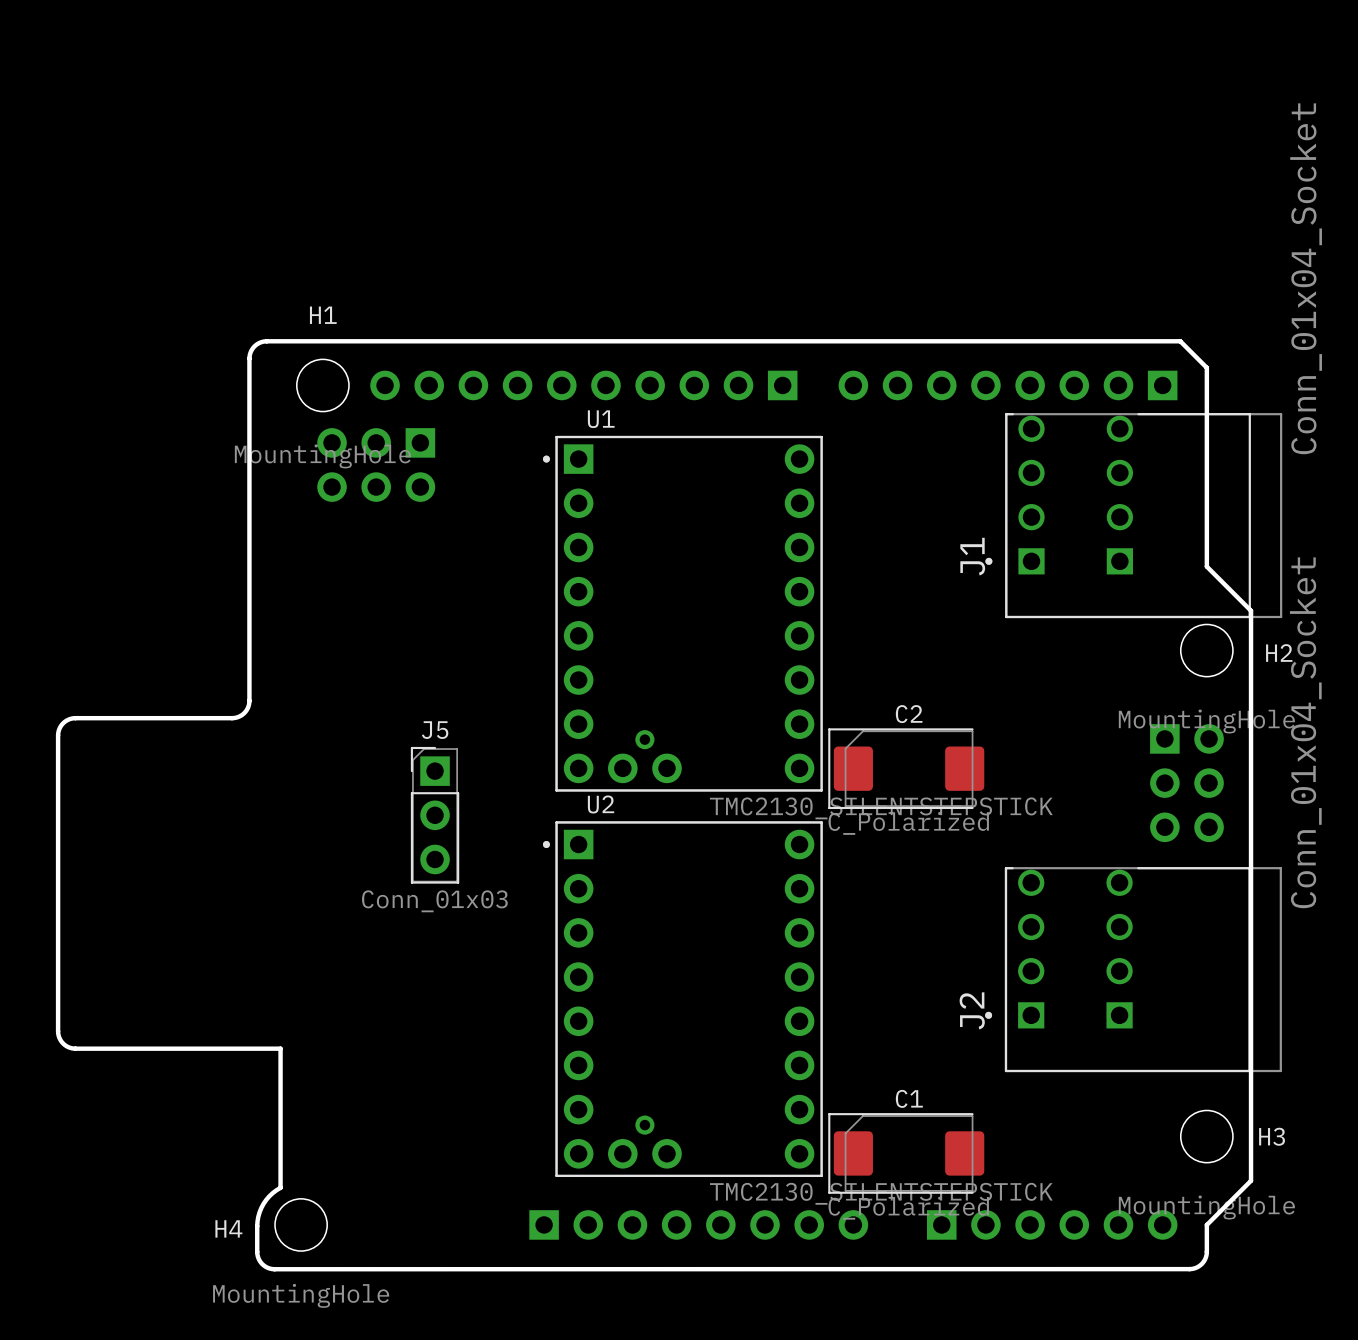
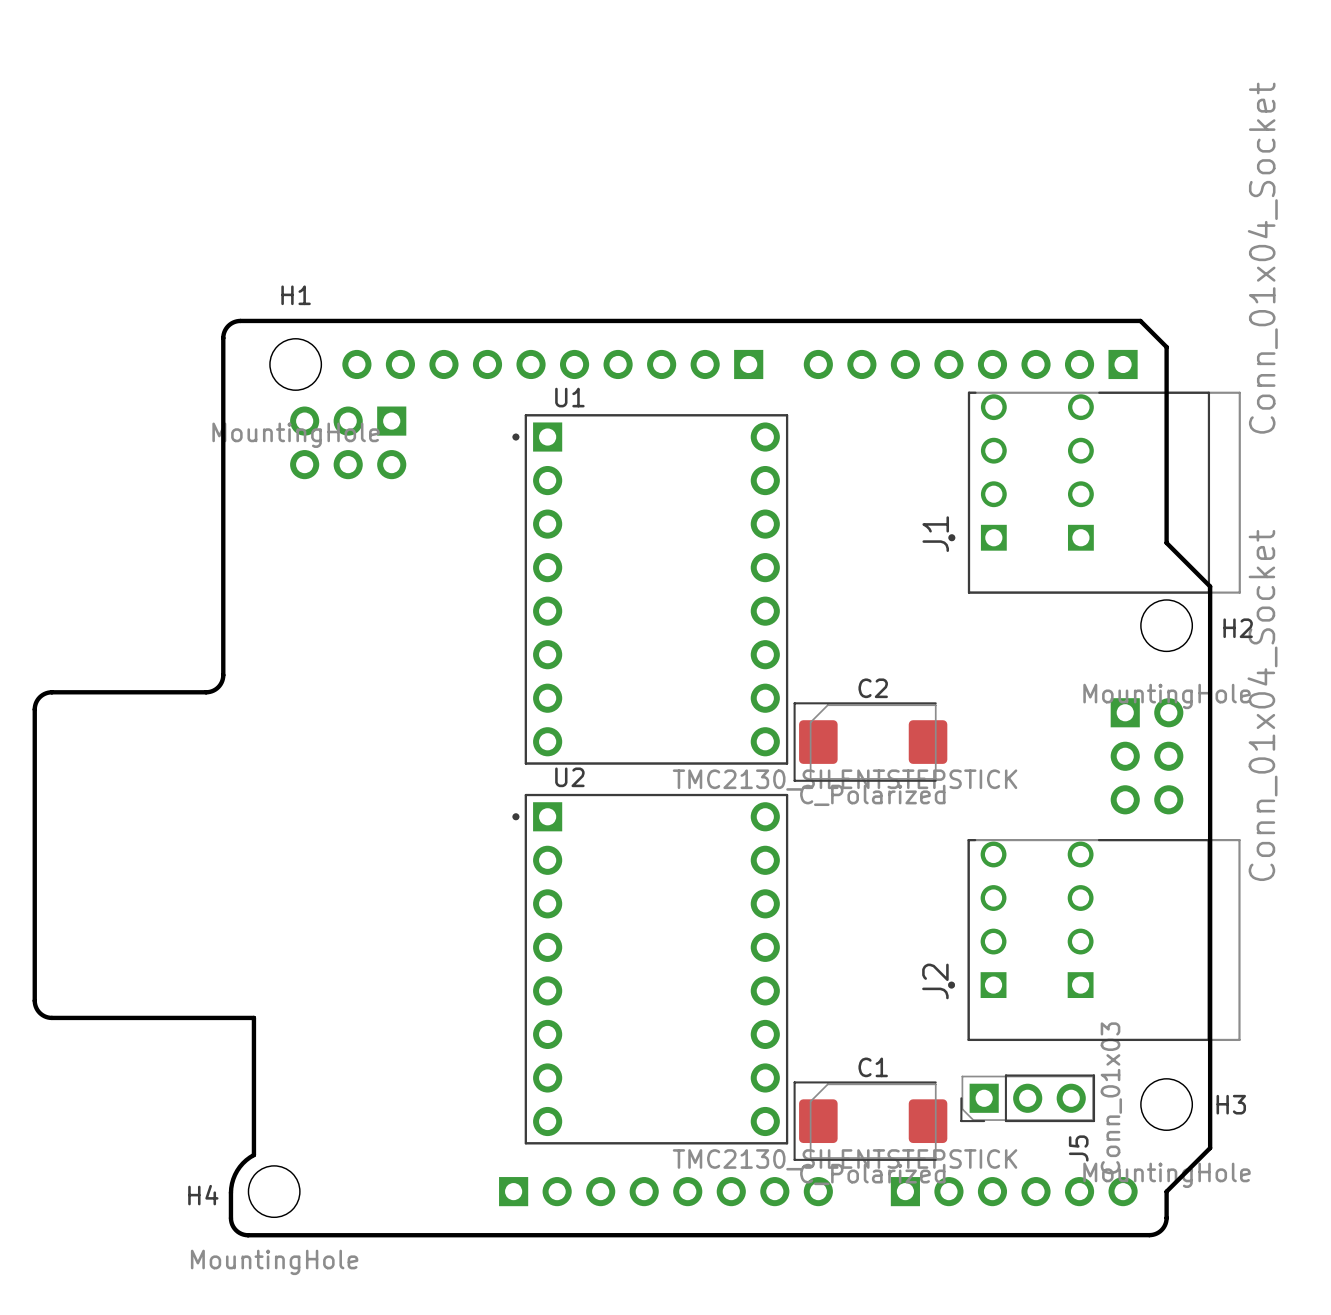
U1 footprint: [542, 435, 823, 792] -> [512, 414, 789, 765]
J5 name position: J5 (435, 730) -> J5 (1078, 1148)
J5 rotation: 0° (435, 815) -> 90° counterclockwise (1027, 1098)
J5 position: (435, 815) -> (1027, 1098)
U2 footprint: [542, 821, 823, 1178] -> [512, 793, 789, 1145]

